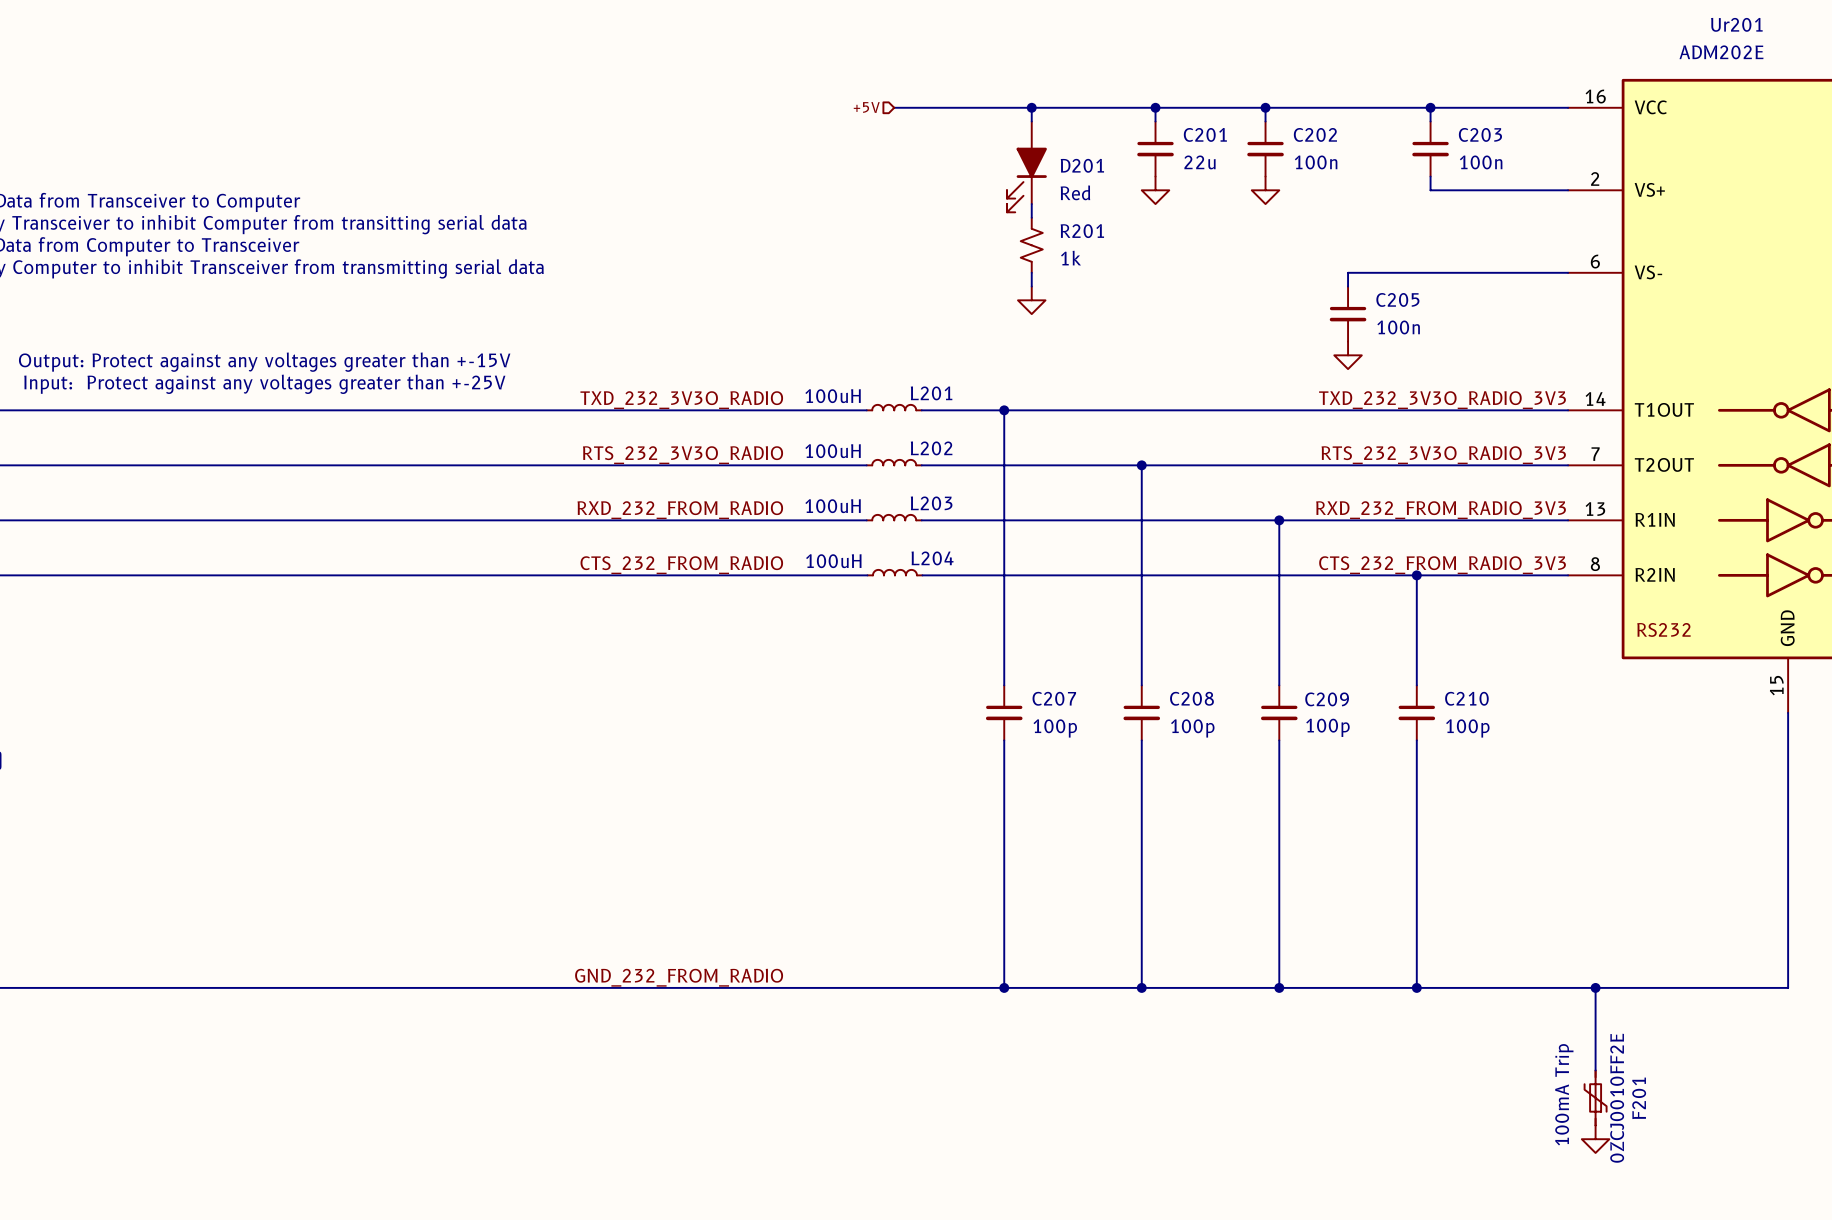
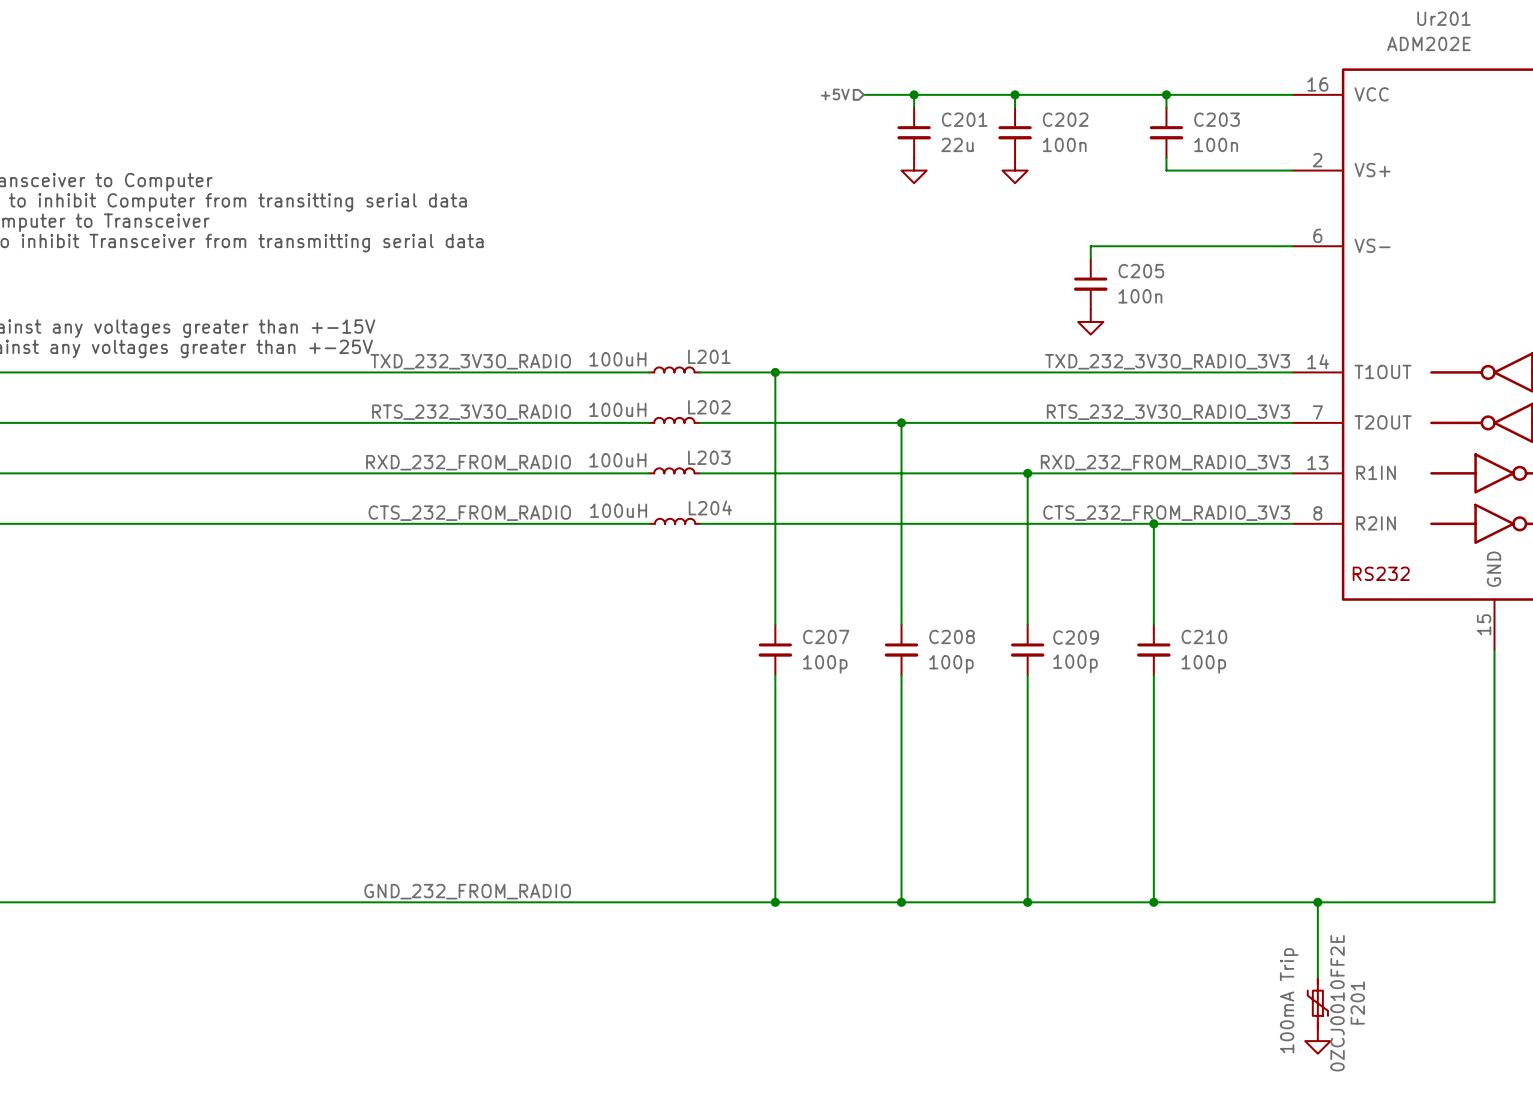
hierarchical label position: +5V (866, 107) -> +5V (835, 94)
wire: (894, 107) (1100, 107) -> none
wire: (1031, 107) (1031, 121) -> none
junction: (1031, 107) -> none
D201: Red (1026, 166) -> none
wire: (1031, 204) (1031, 217) -> none
R201: 1k (1031, 245) -> none
wire: (1031, 272) (1031, 286) -> none
power symbol: (1031, 300) -> none

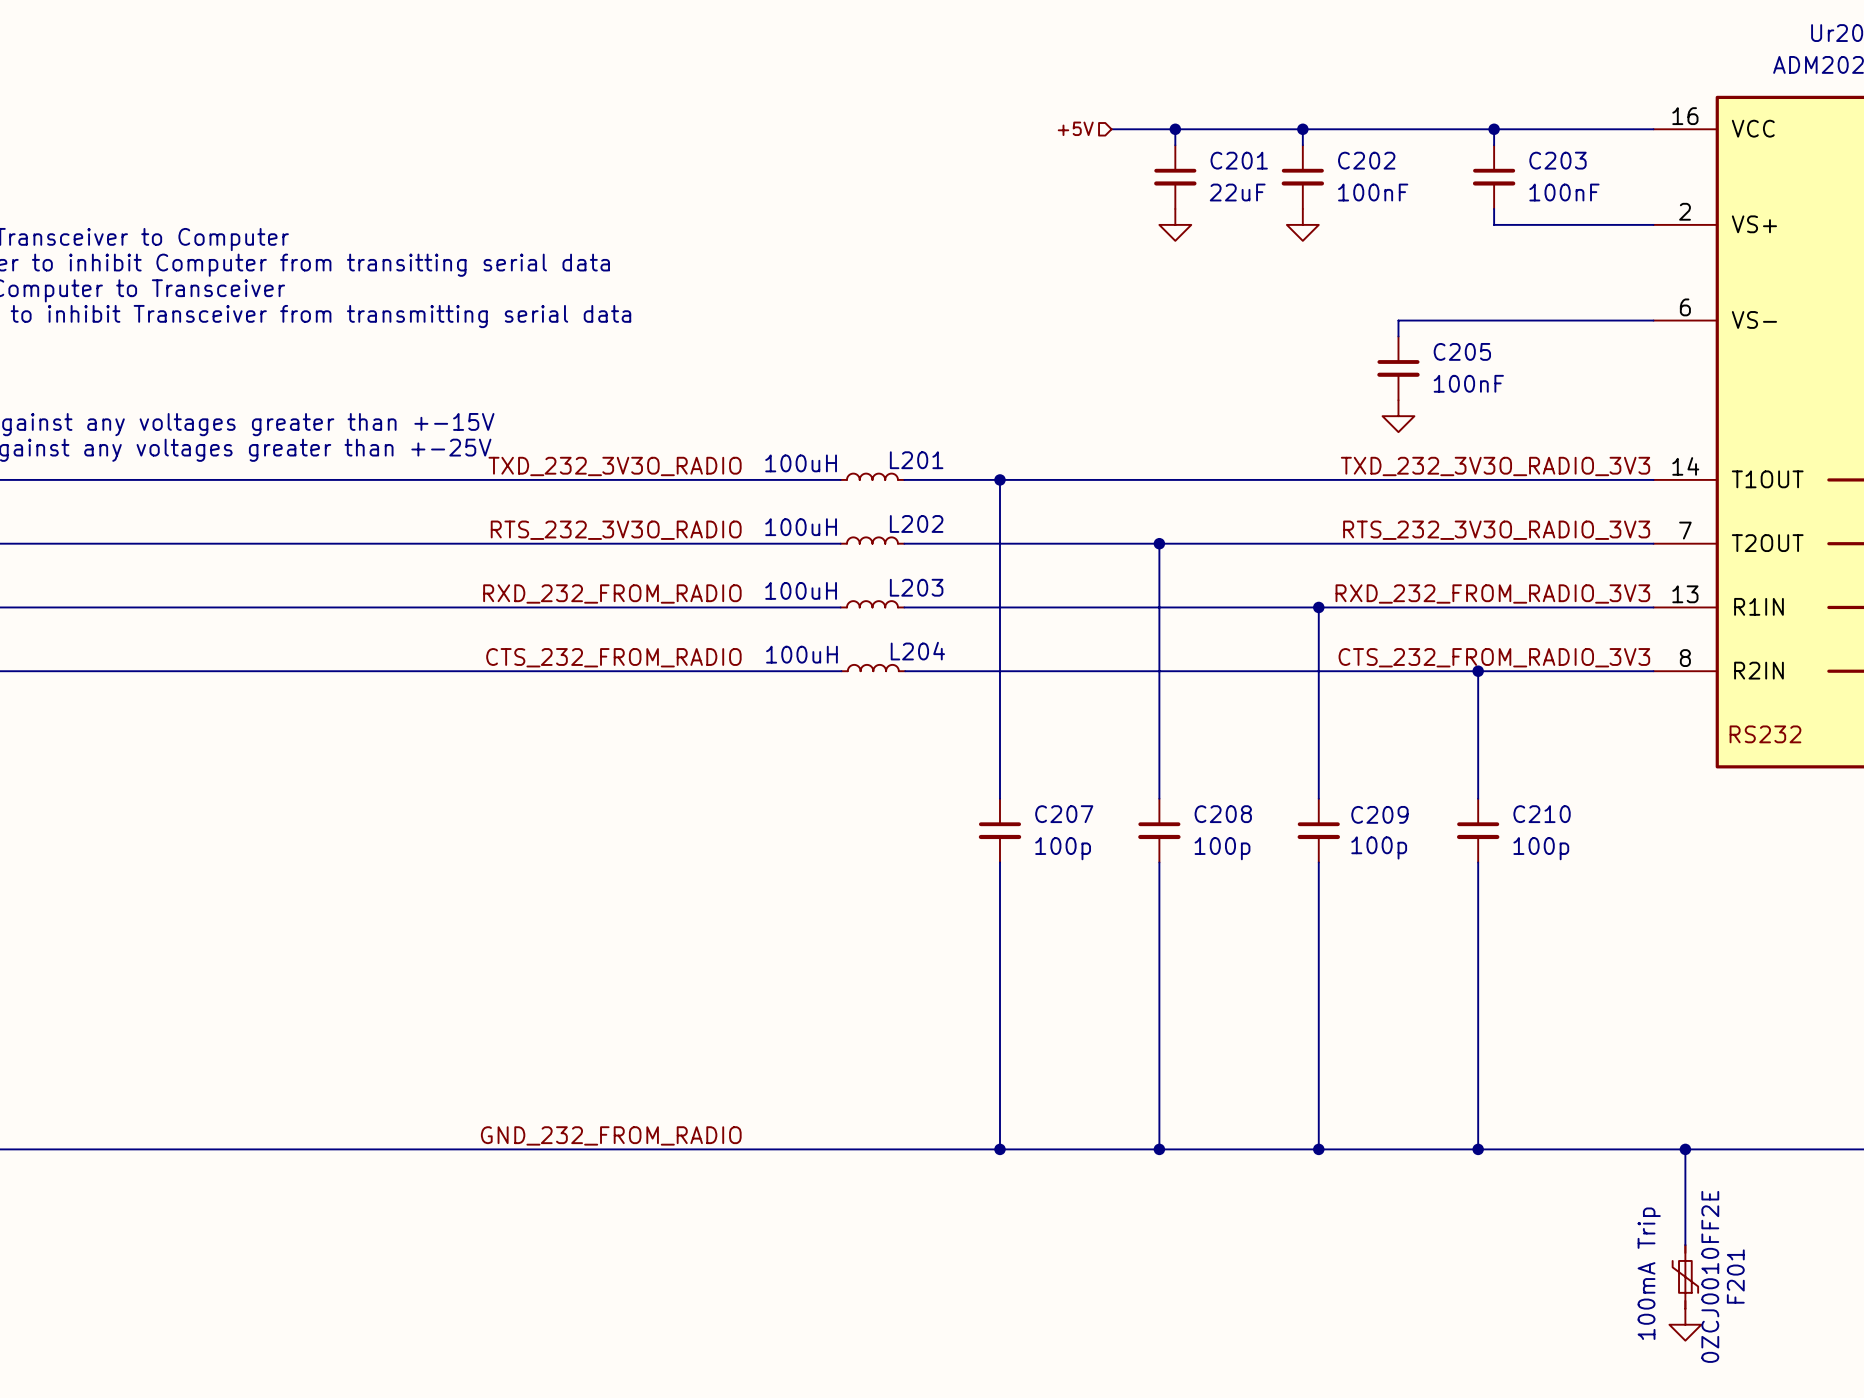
C201 value: 22u (957, 144) -> 22uF (1237, 192)
C202 value: 100n (1064, 144) -> 100nF (1373, 192)
C203 value: 100n (1216, 144) -> 100nF (1564, 192)
C205 value: 100n (1140, 296) -> 100nF (1468, 383)

